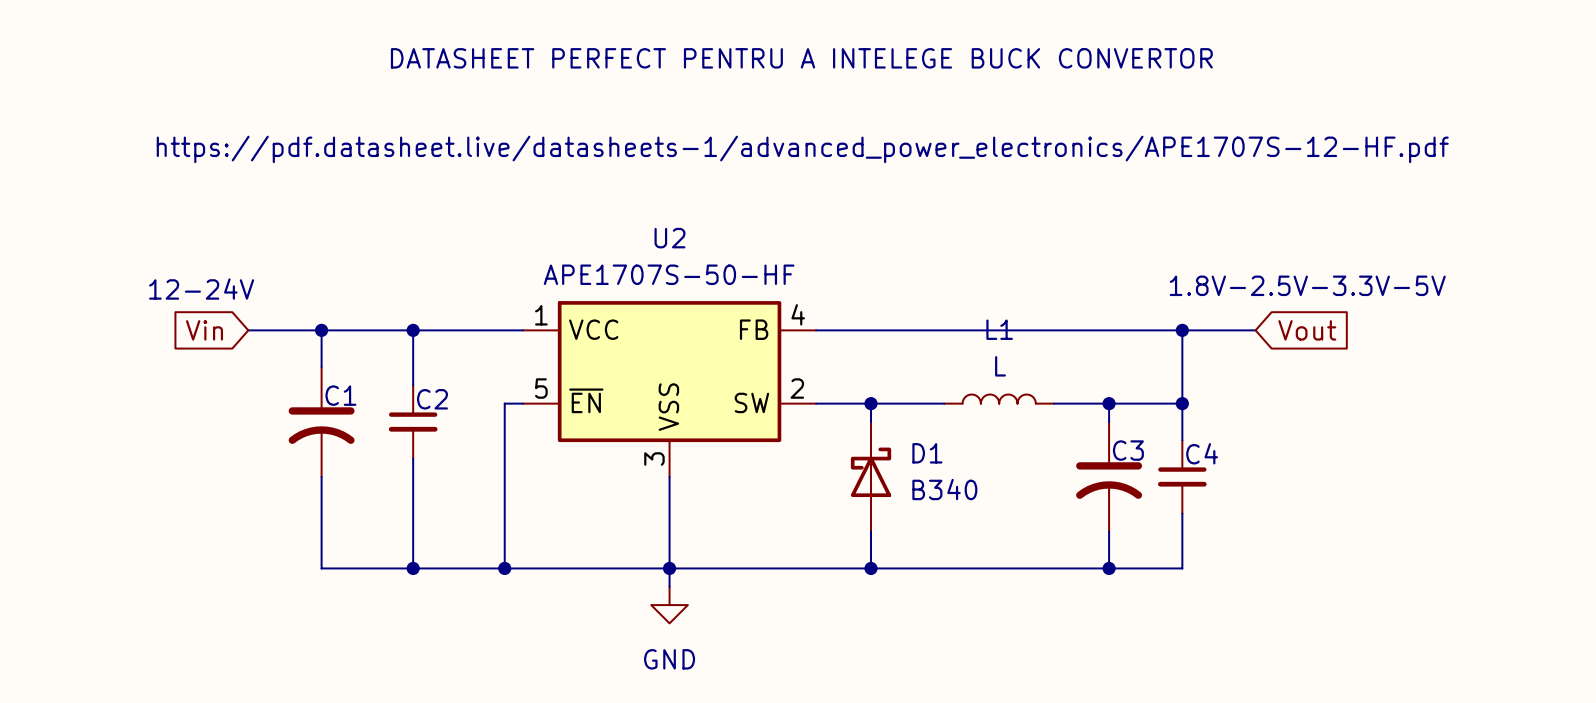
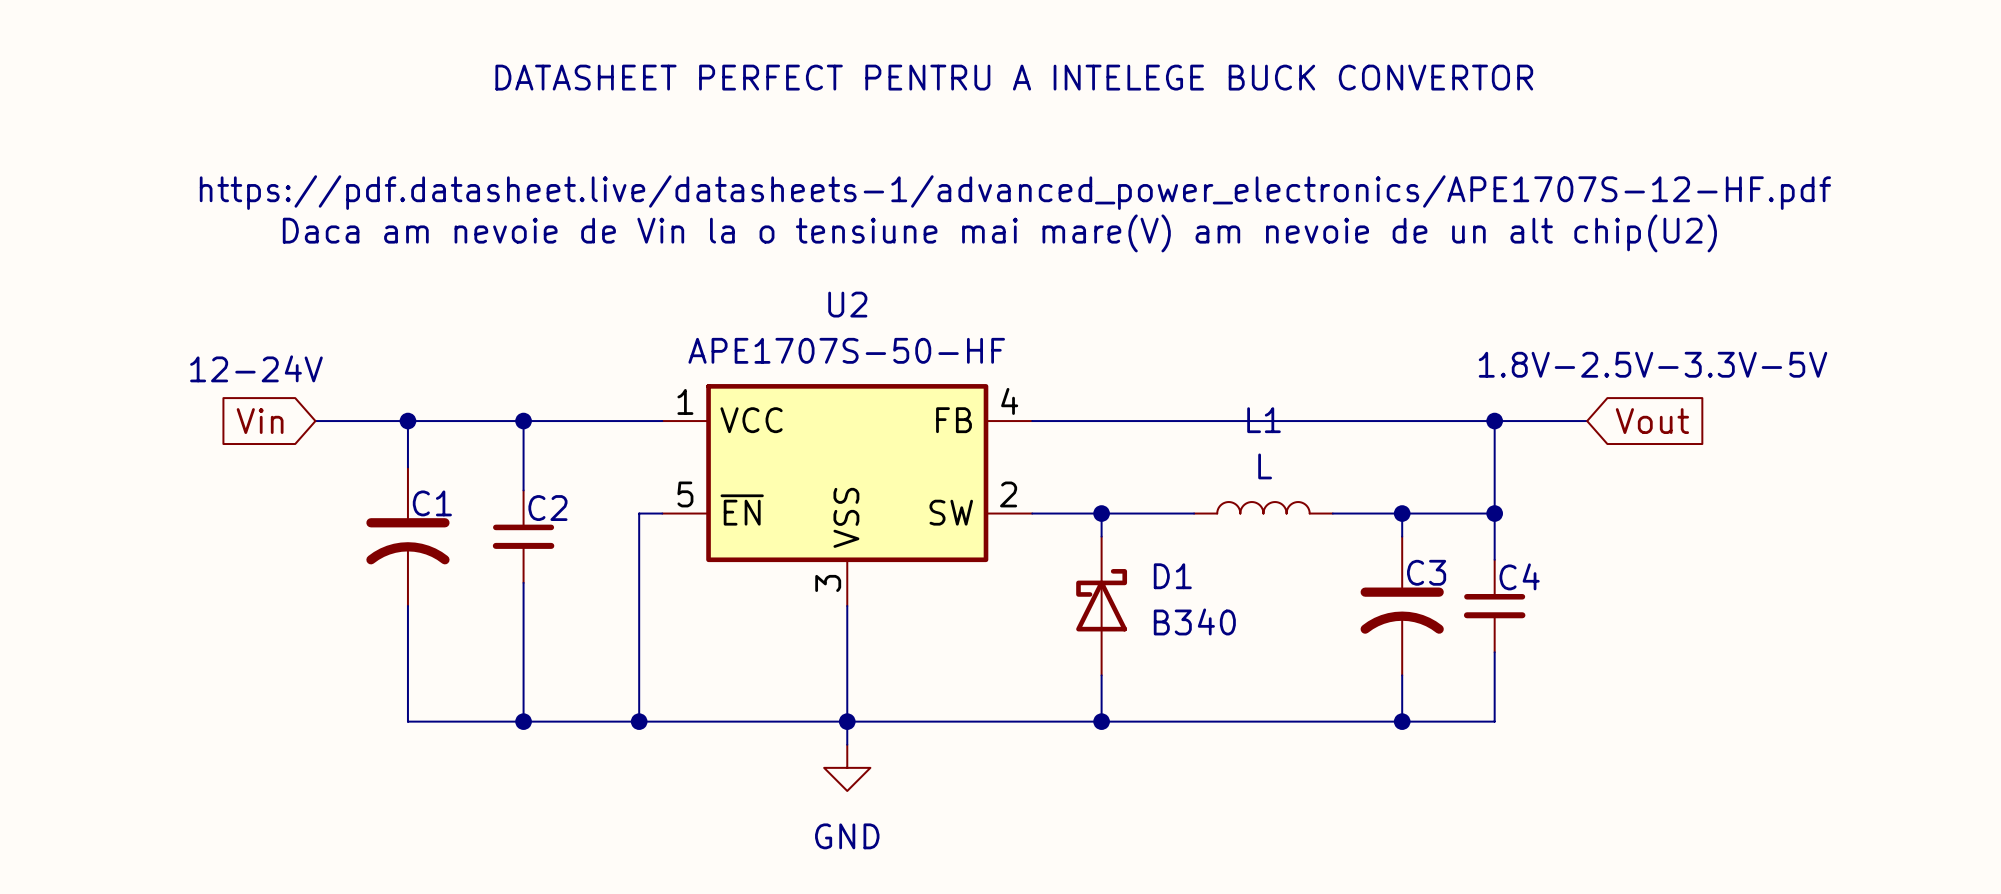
text: none -> Daca am nevoie de Vin la o tensiune mai mare(V) am nevoie de un alt chip(U2) (999, 233)

